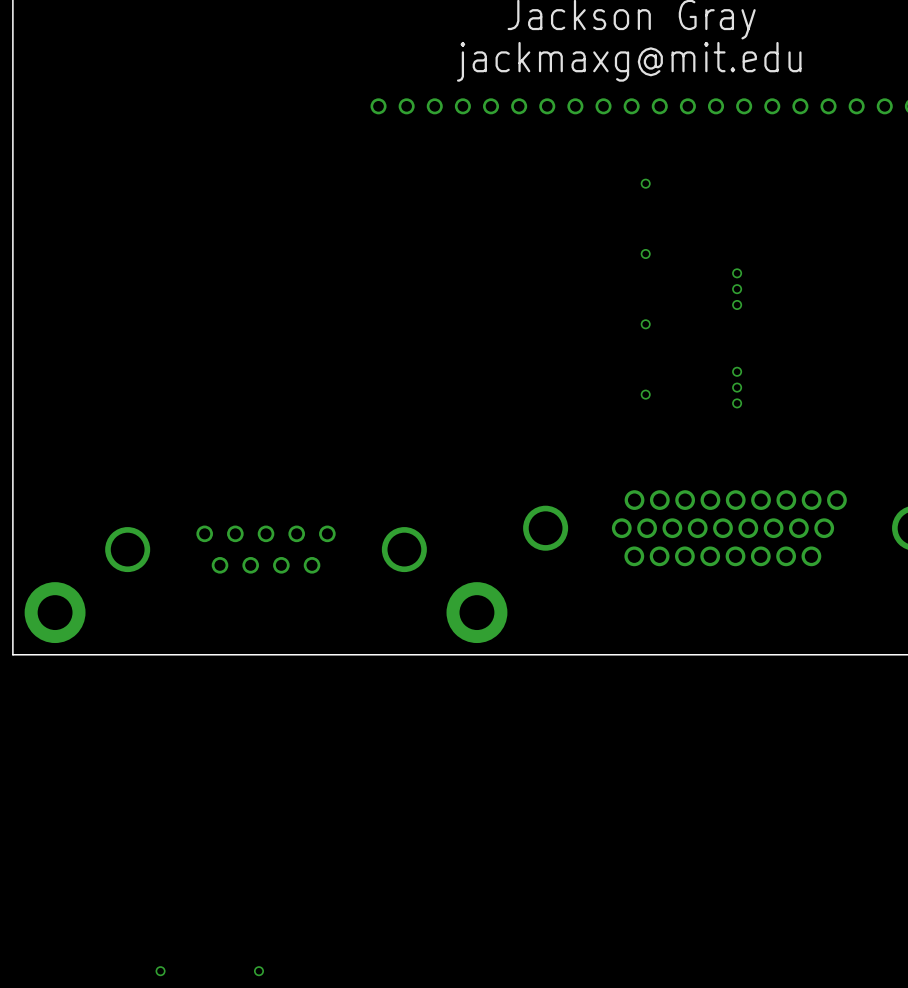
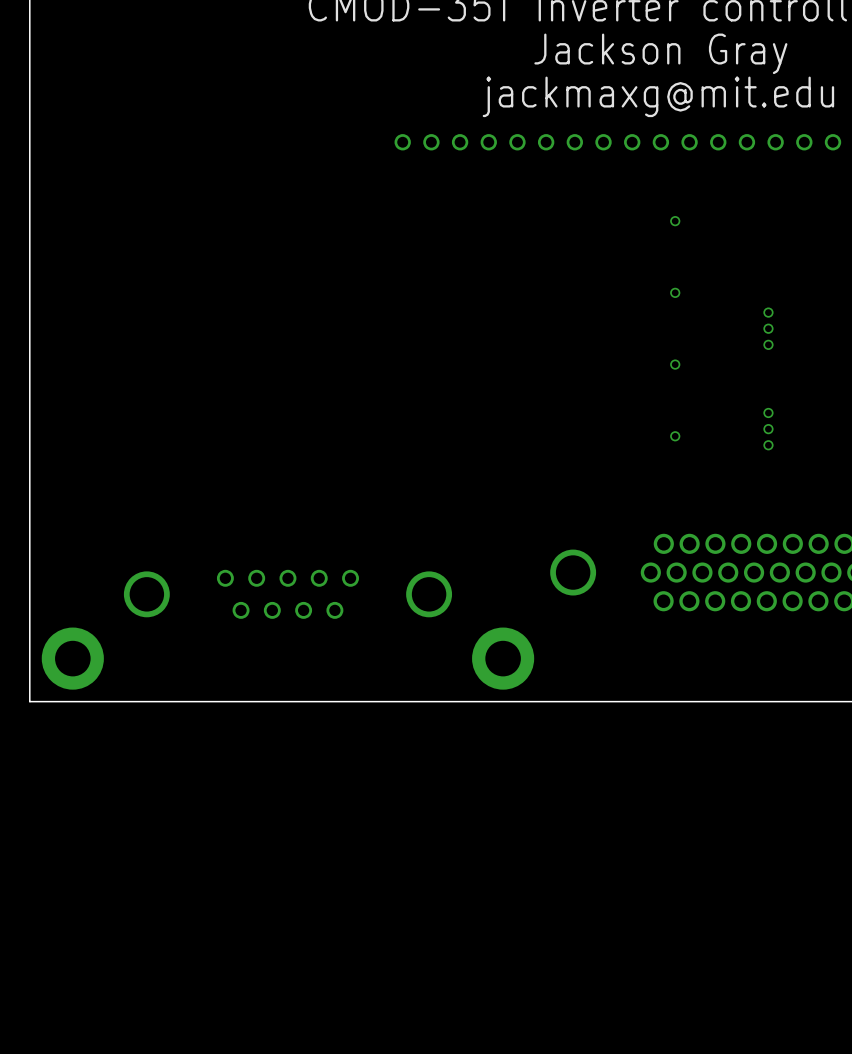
part: (160, 971) -> none
part: (258, 971) -> none

